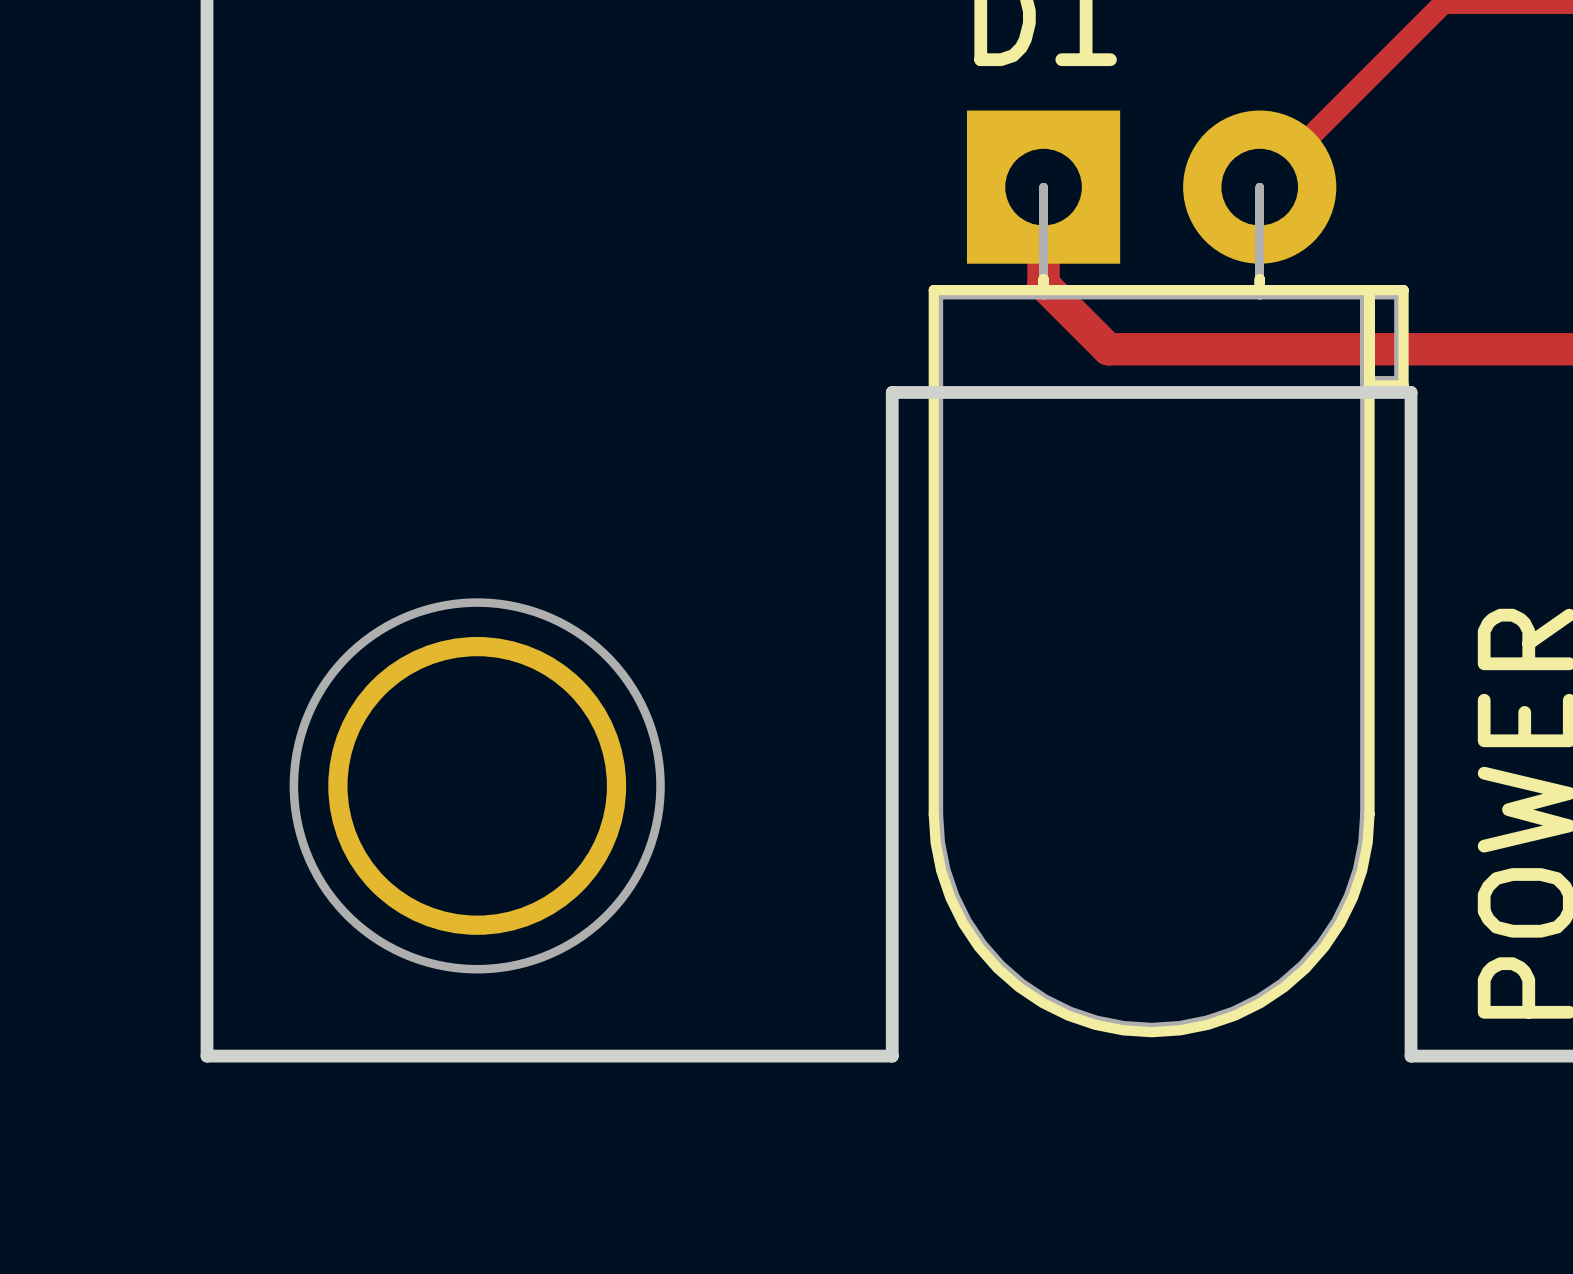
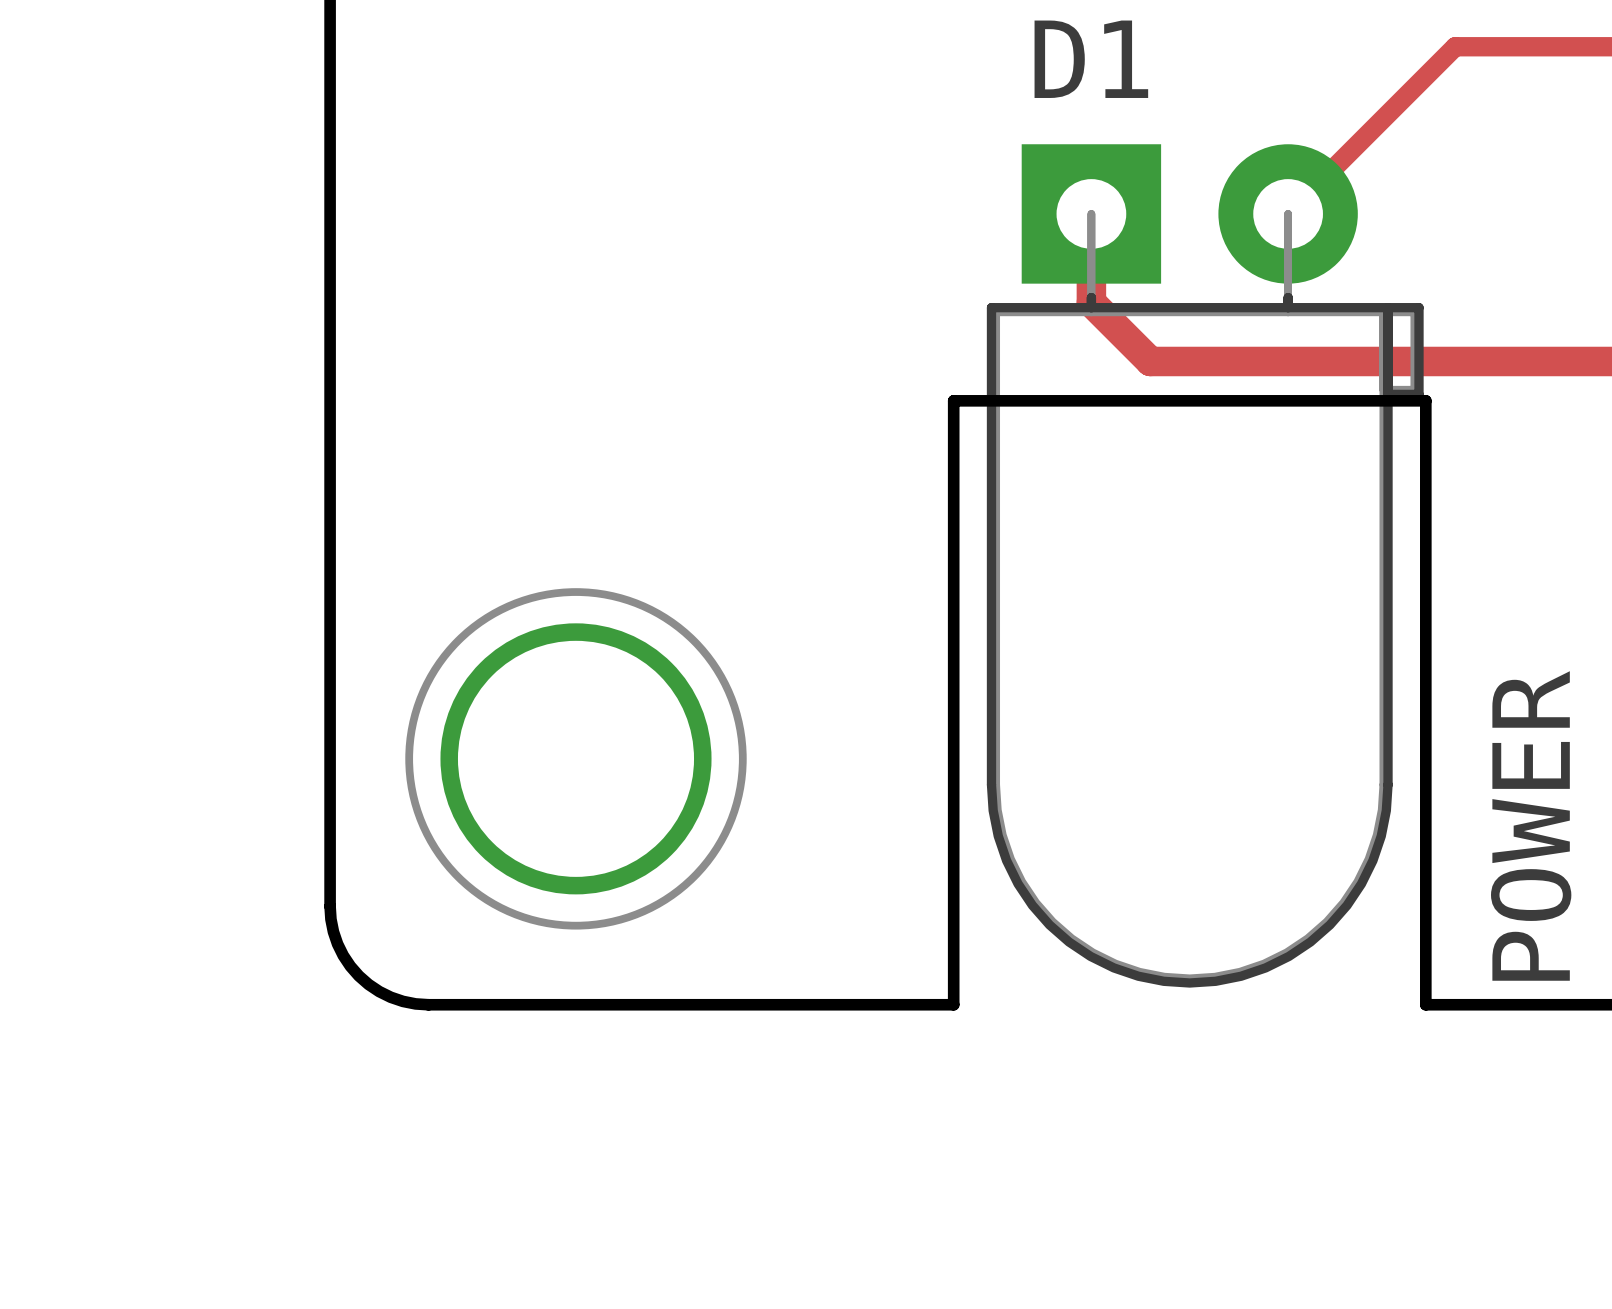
board edge: (207, 948) (207, 1056) (315, 1056) -> (330, 906) (330, 919) (337, 944) (343, 955) (358, 975) (379, 991) (390, 997) (403, 1001) (428, 1004)

